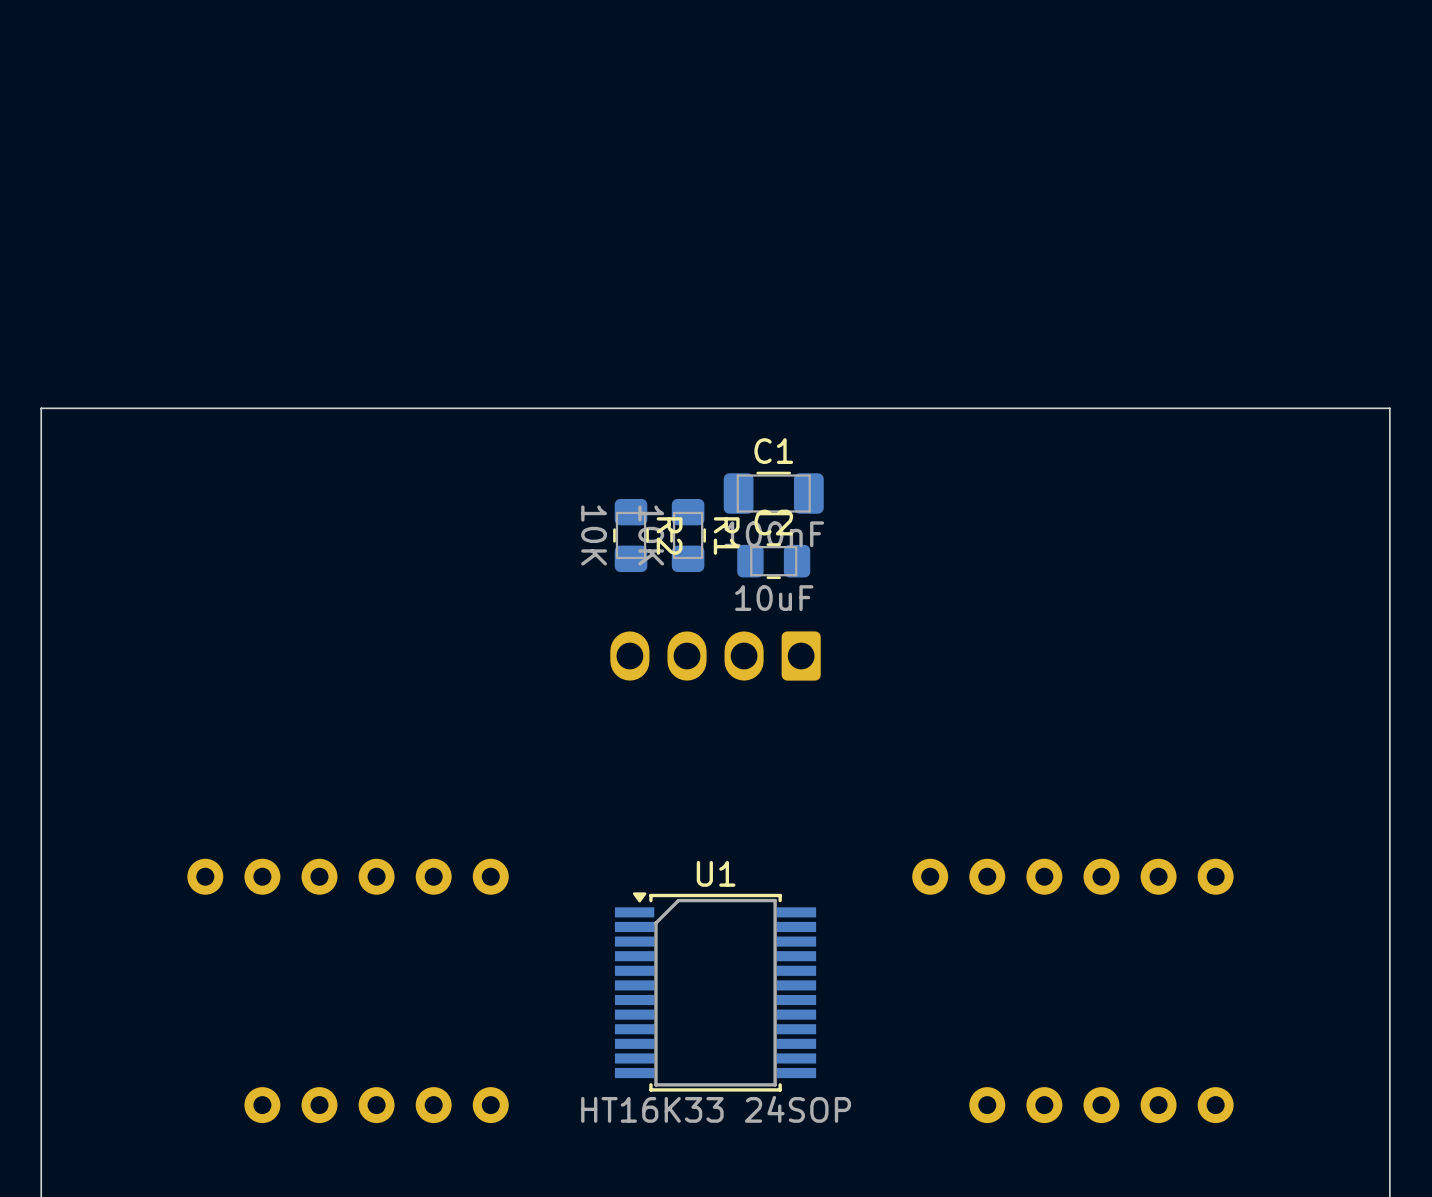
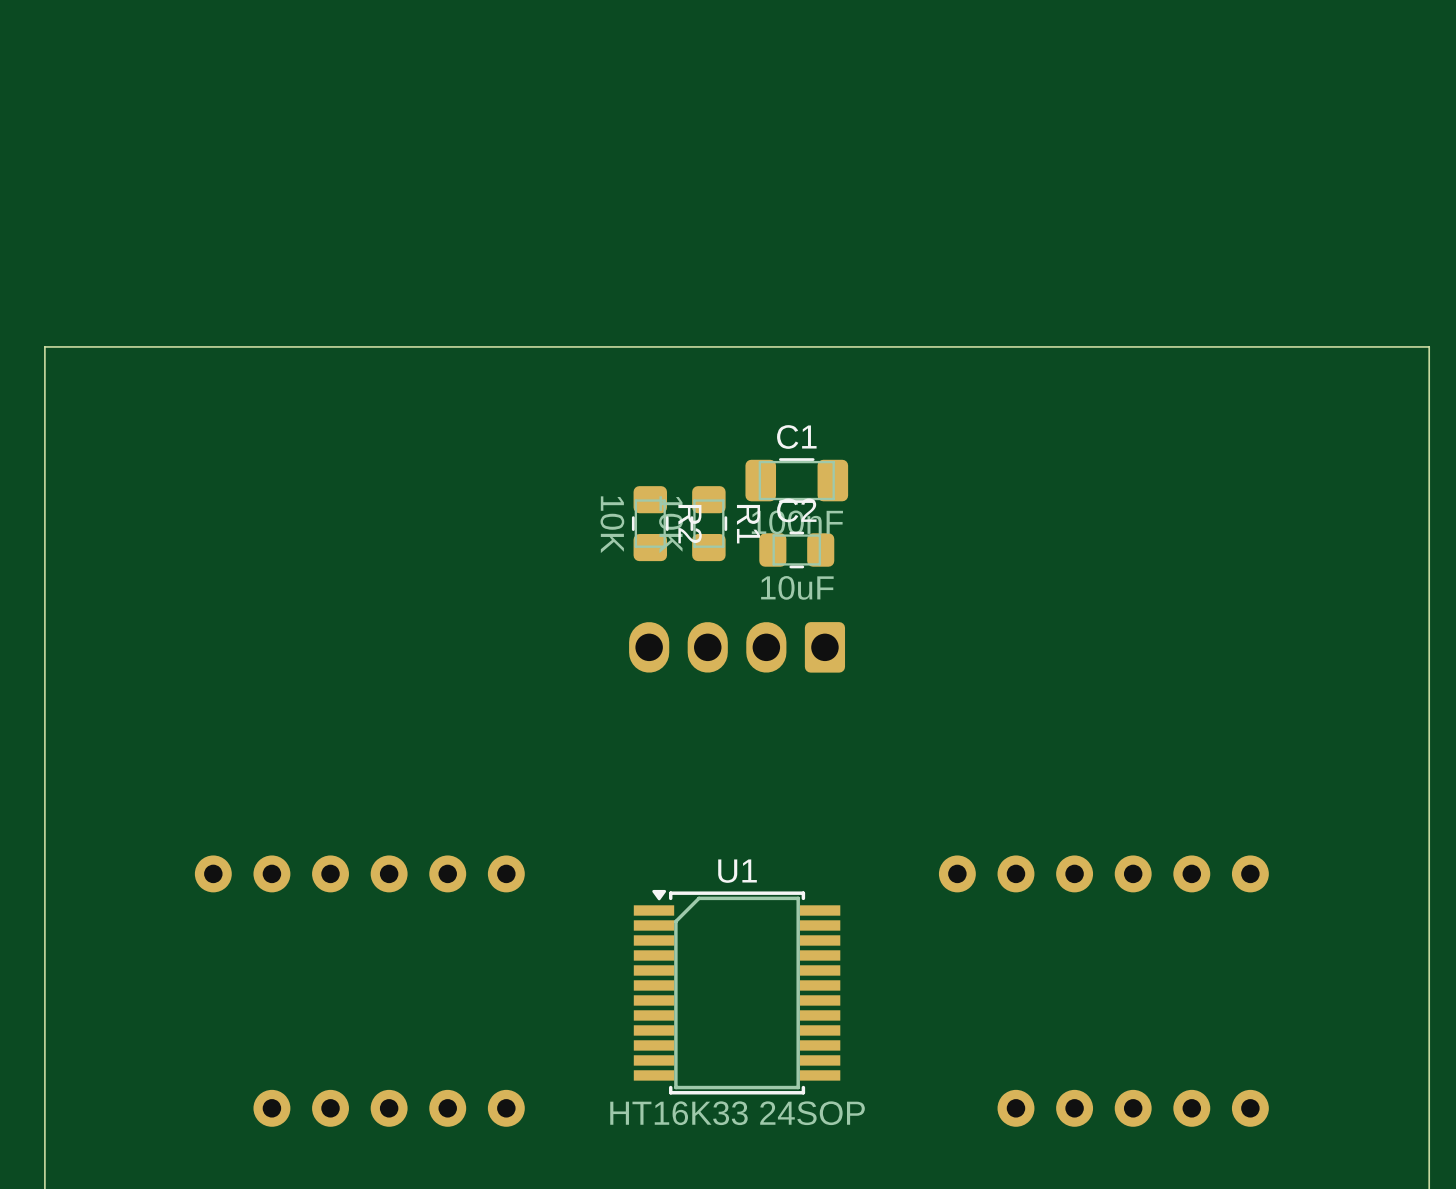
board edge: (1389, 408) (41, 408) -> (1429, 393) (1429, 346) (44, 346) (44, 393)

